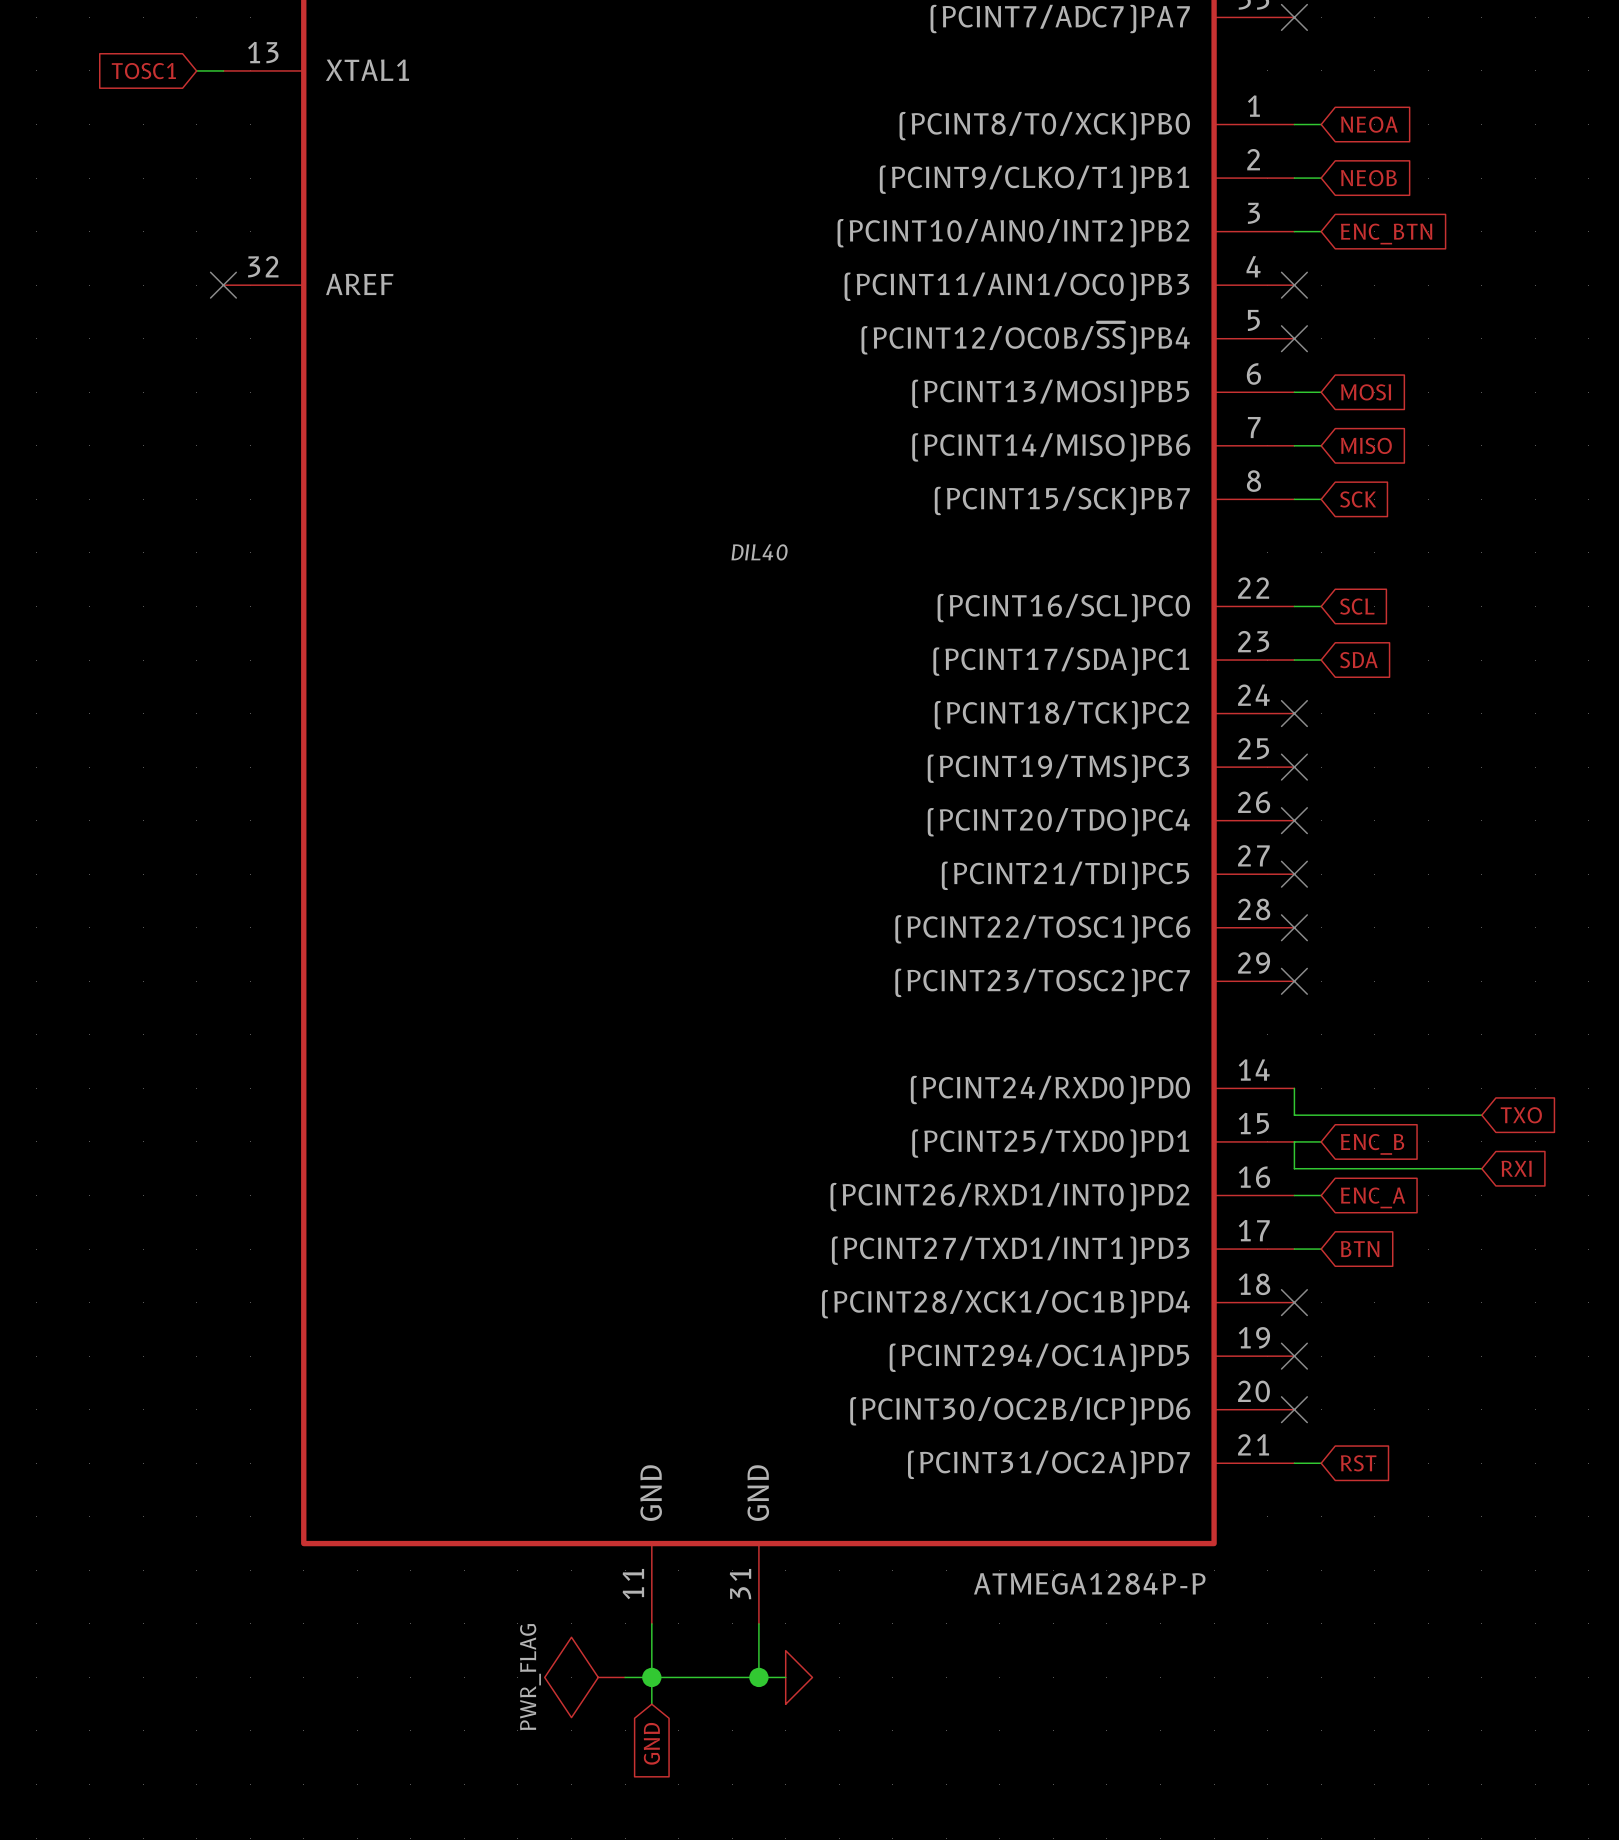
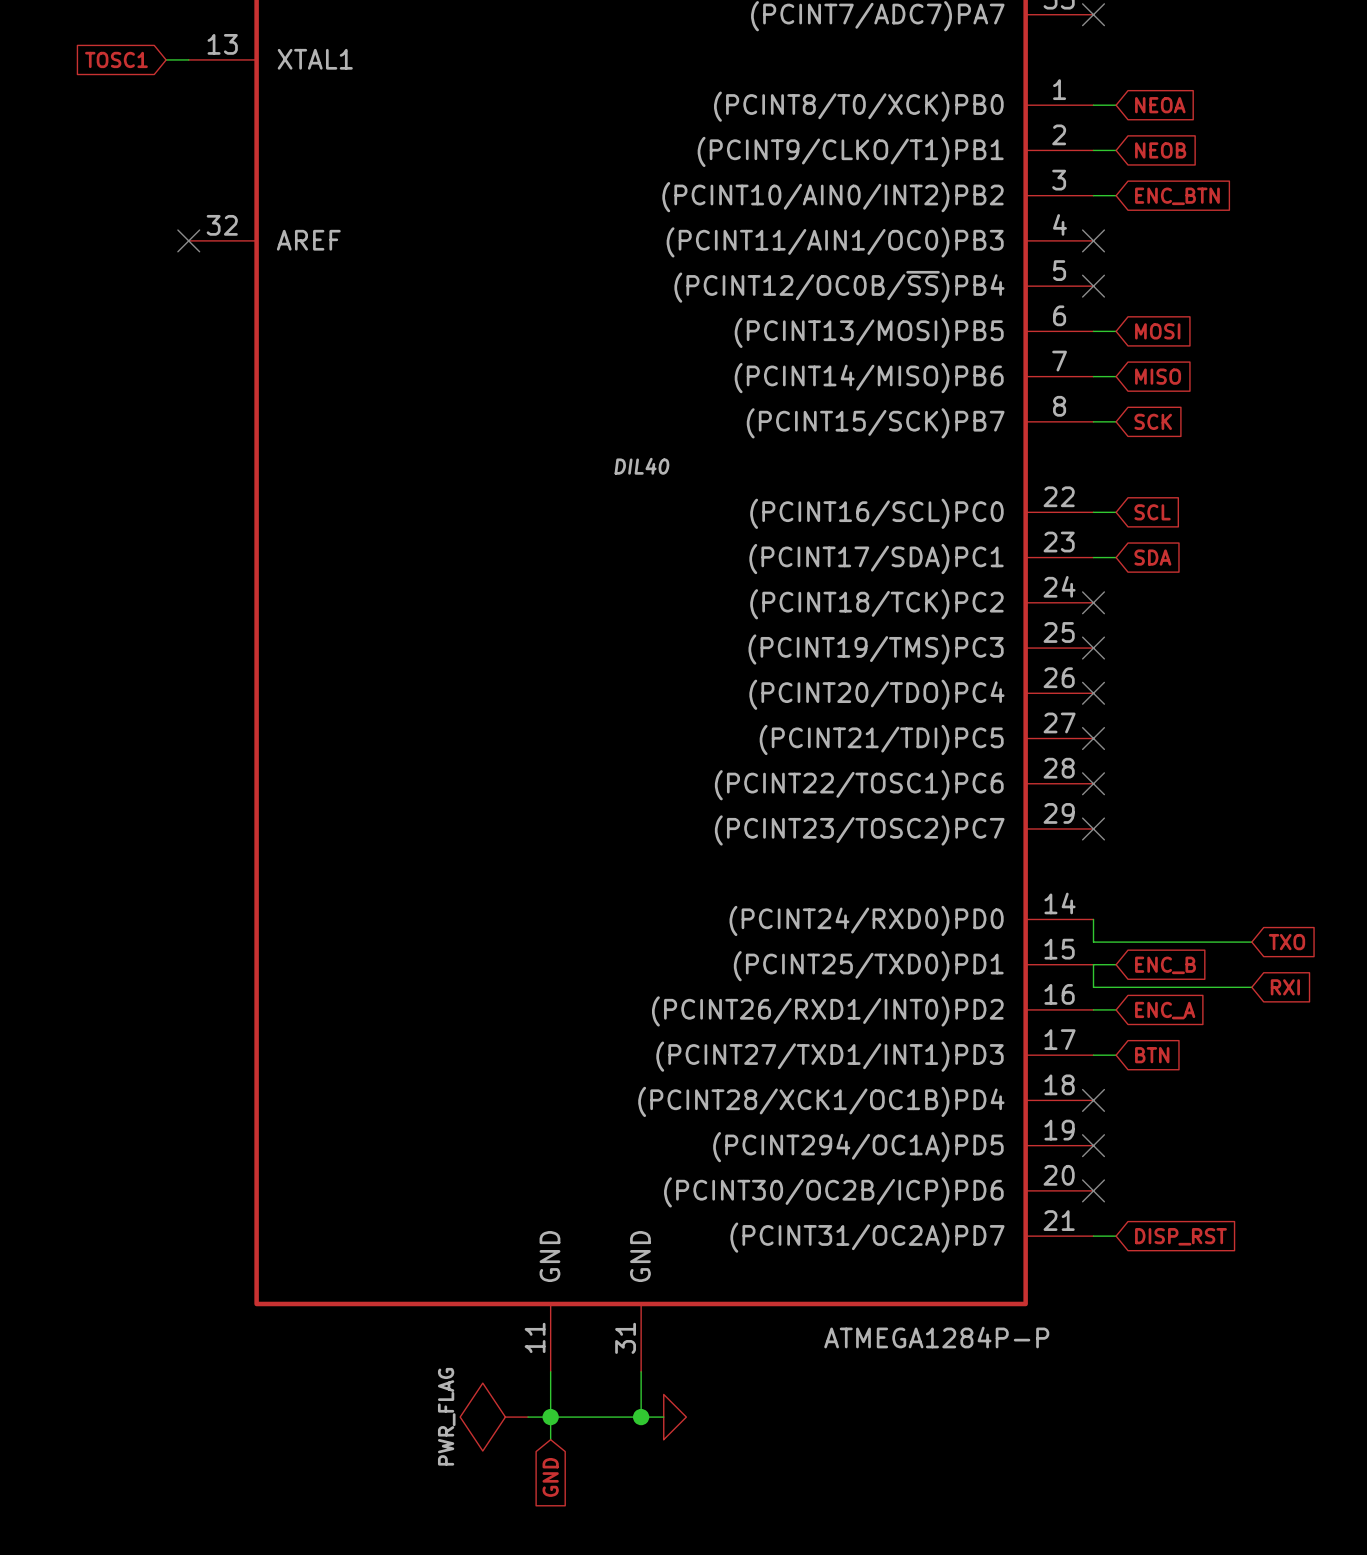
global label: RST (1358, 1463) -> DISP_RST (1180, 1236)

